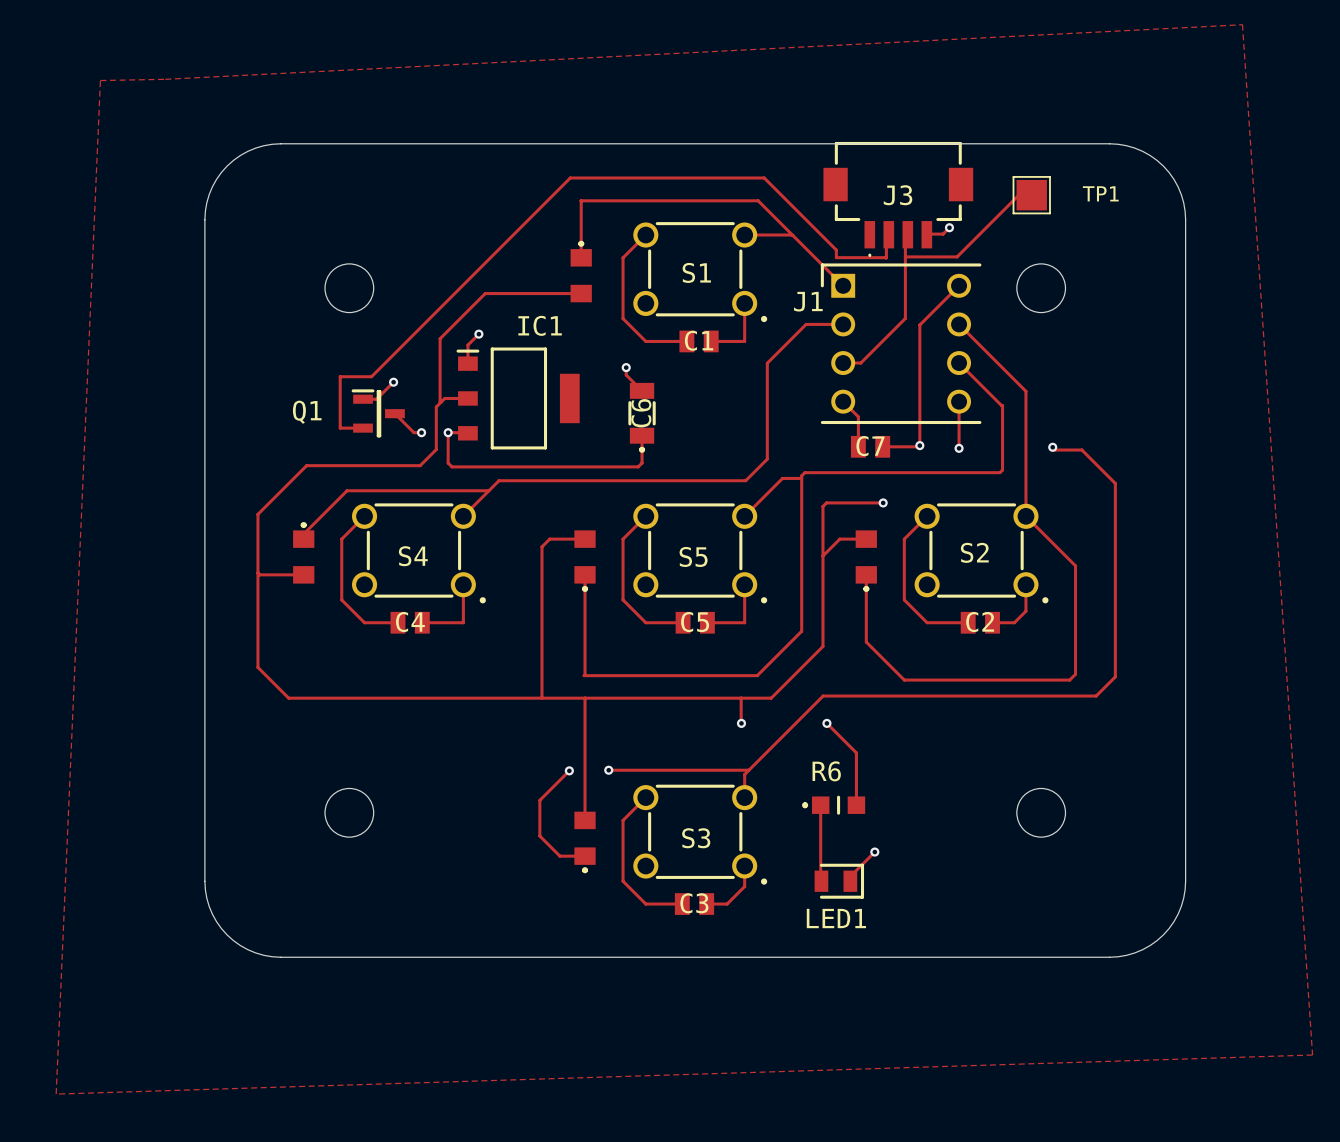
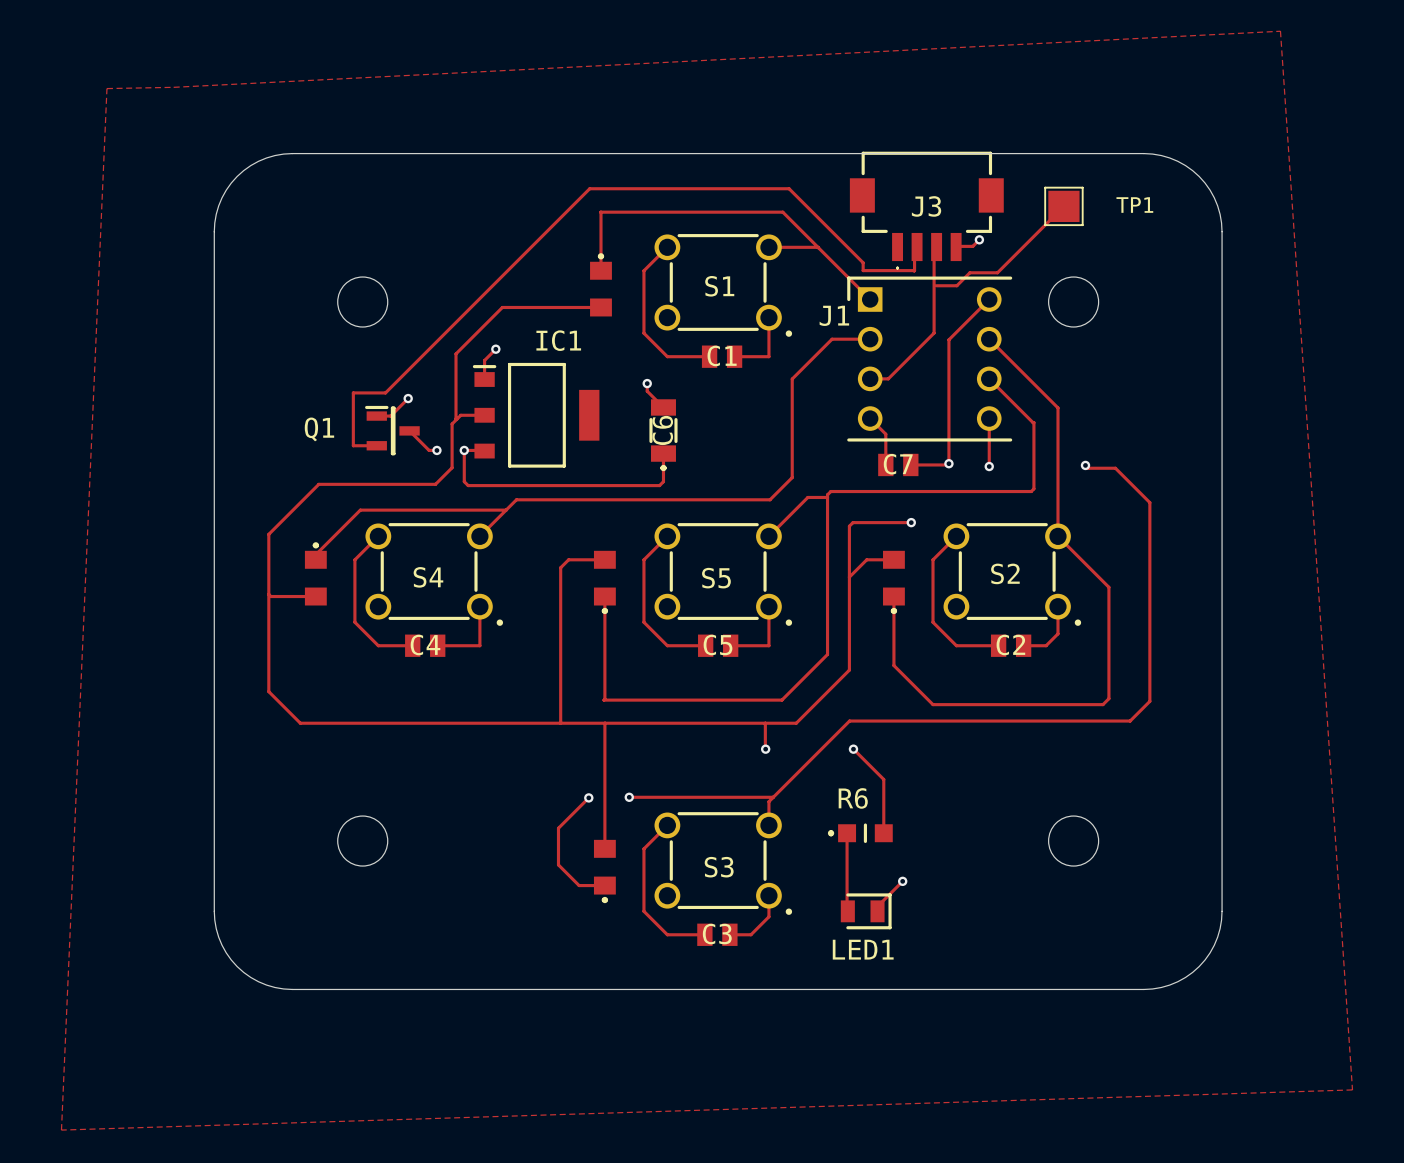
track: (1031, 195) (1018, 195) (957, 256) (905, 256) -> (1063, 206) (997, 272) (969, 272) (956, 285) (936, 285)

